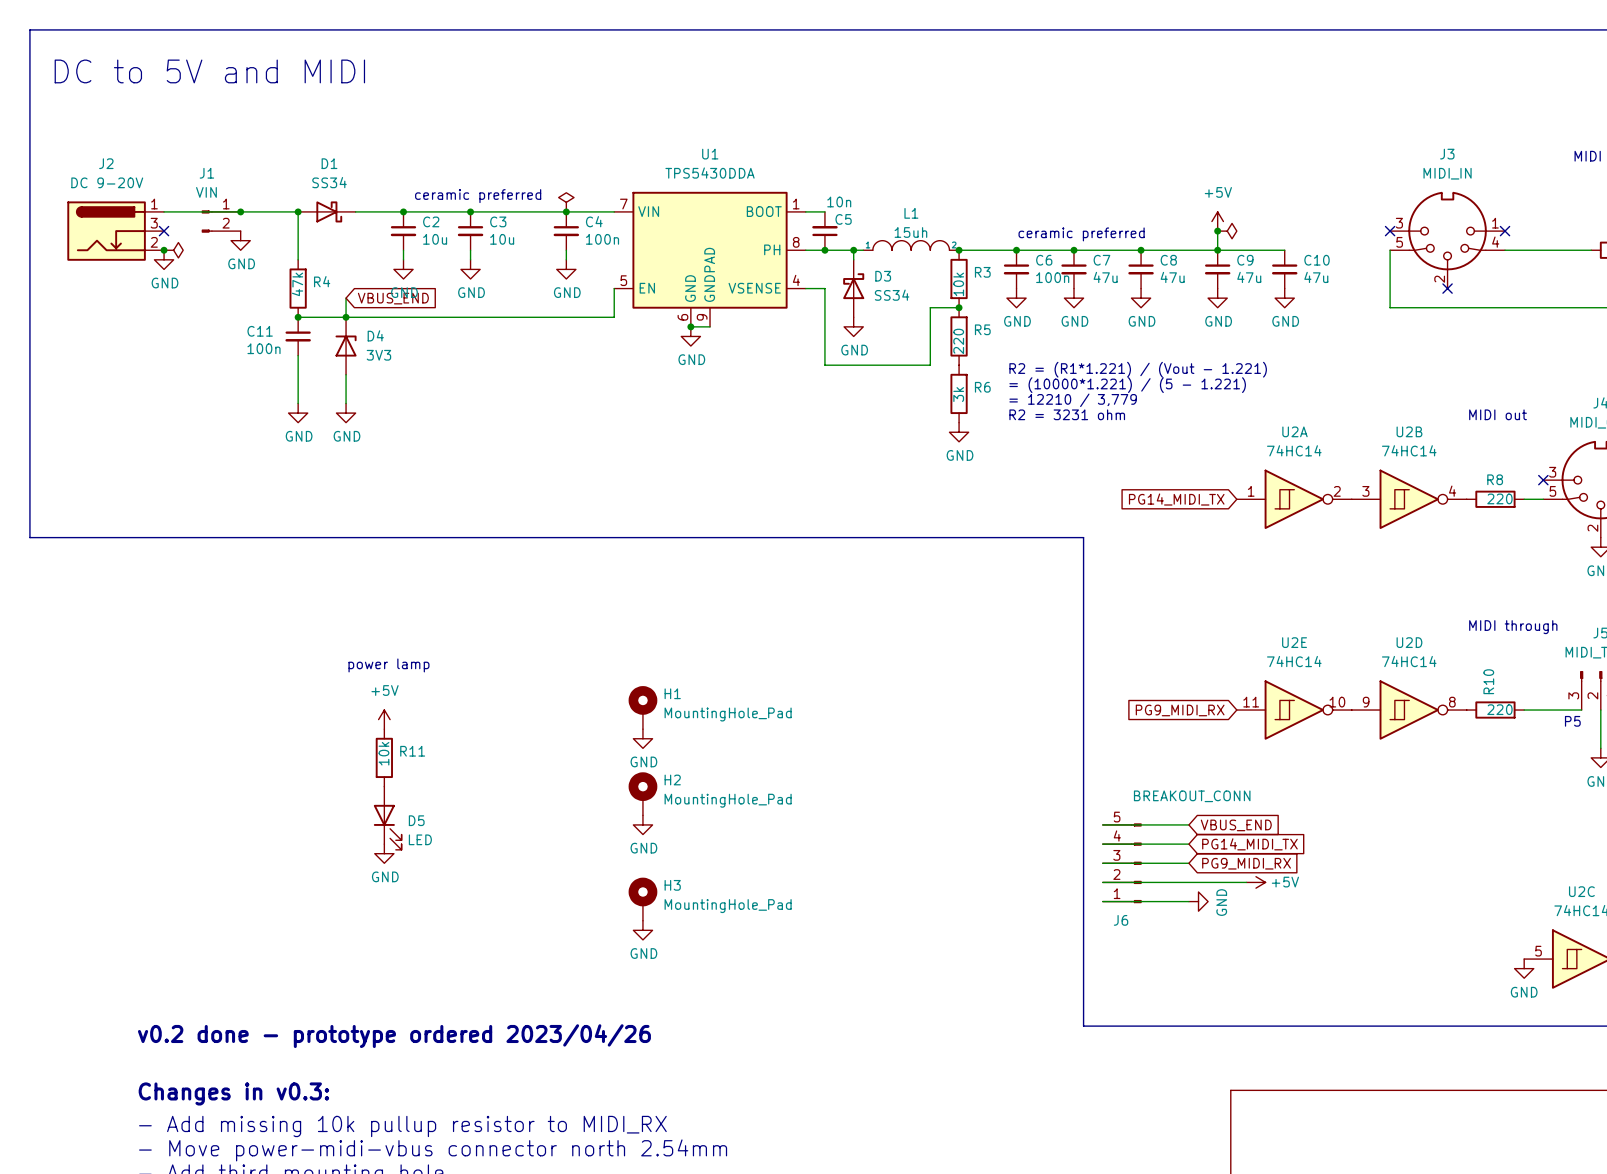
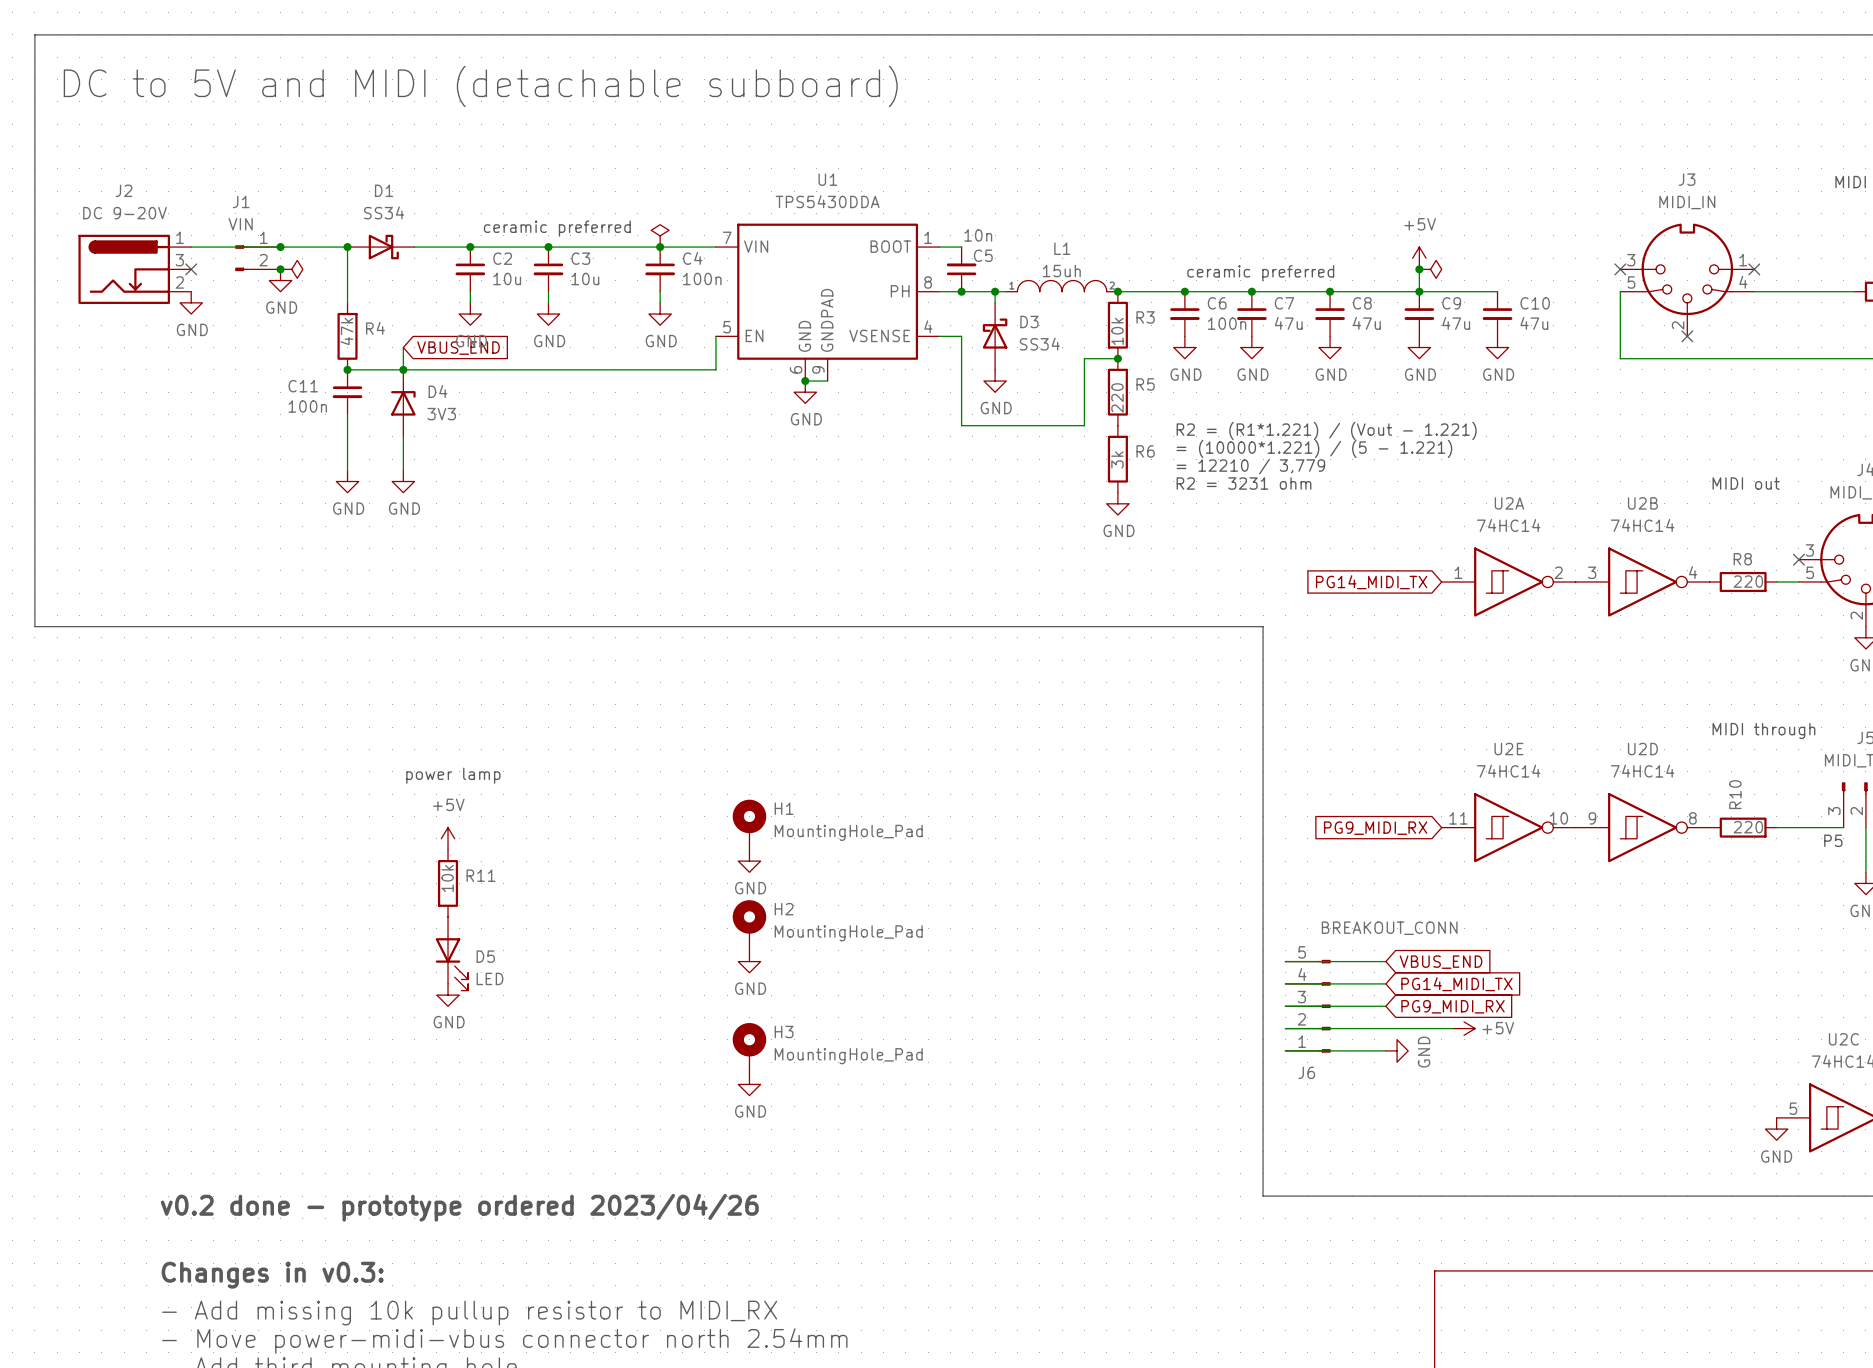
text: DC to 5V and MIDI (209, 71) -> DC to 5V and MIDI (detachable subboard) (480, 86)
junction: none -> (280, 269)
junction: (164, 250) -> none
power symbol position: (173, 250) -> (291, 269)

